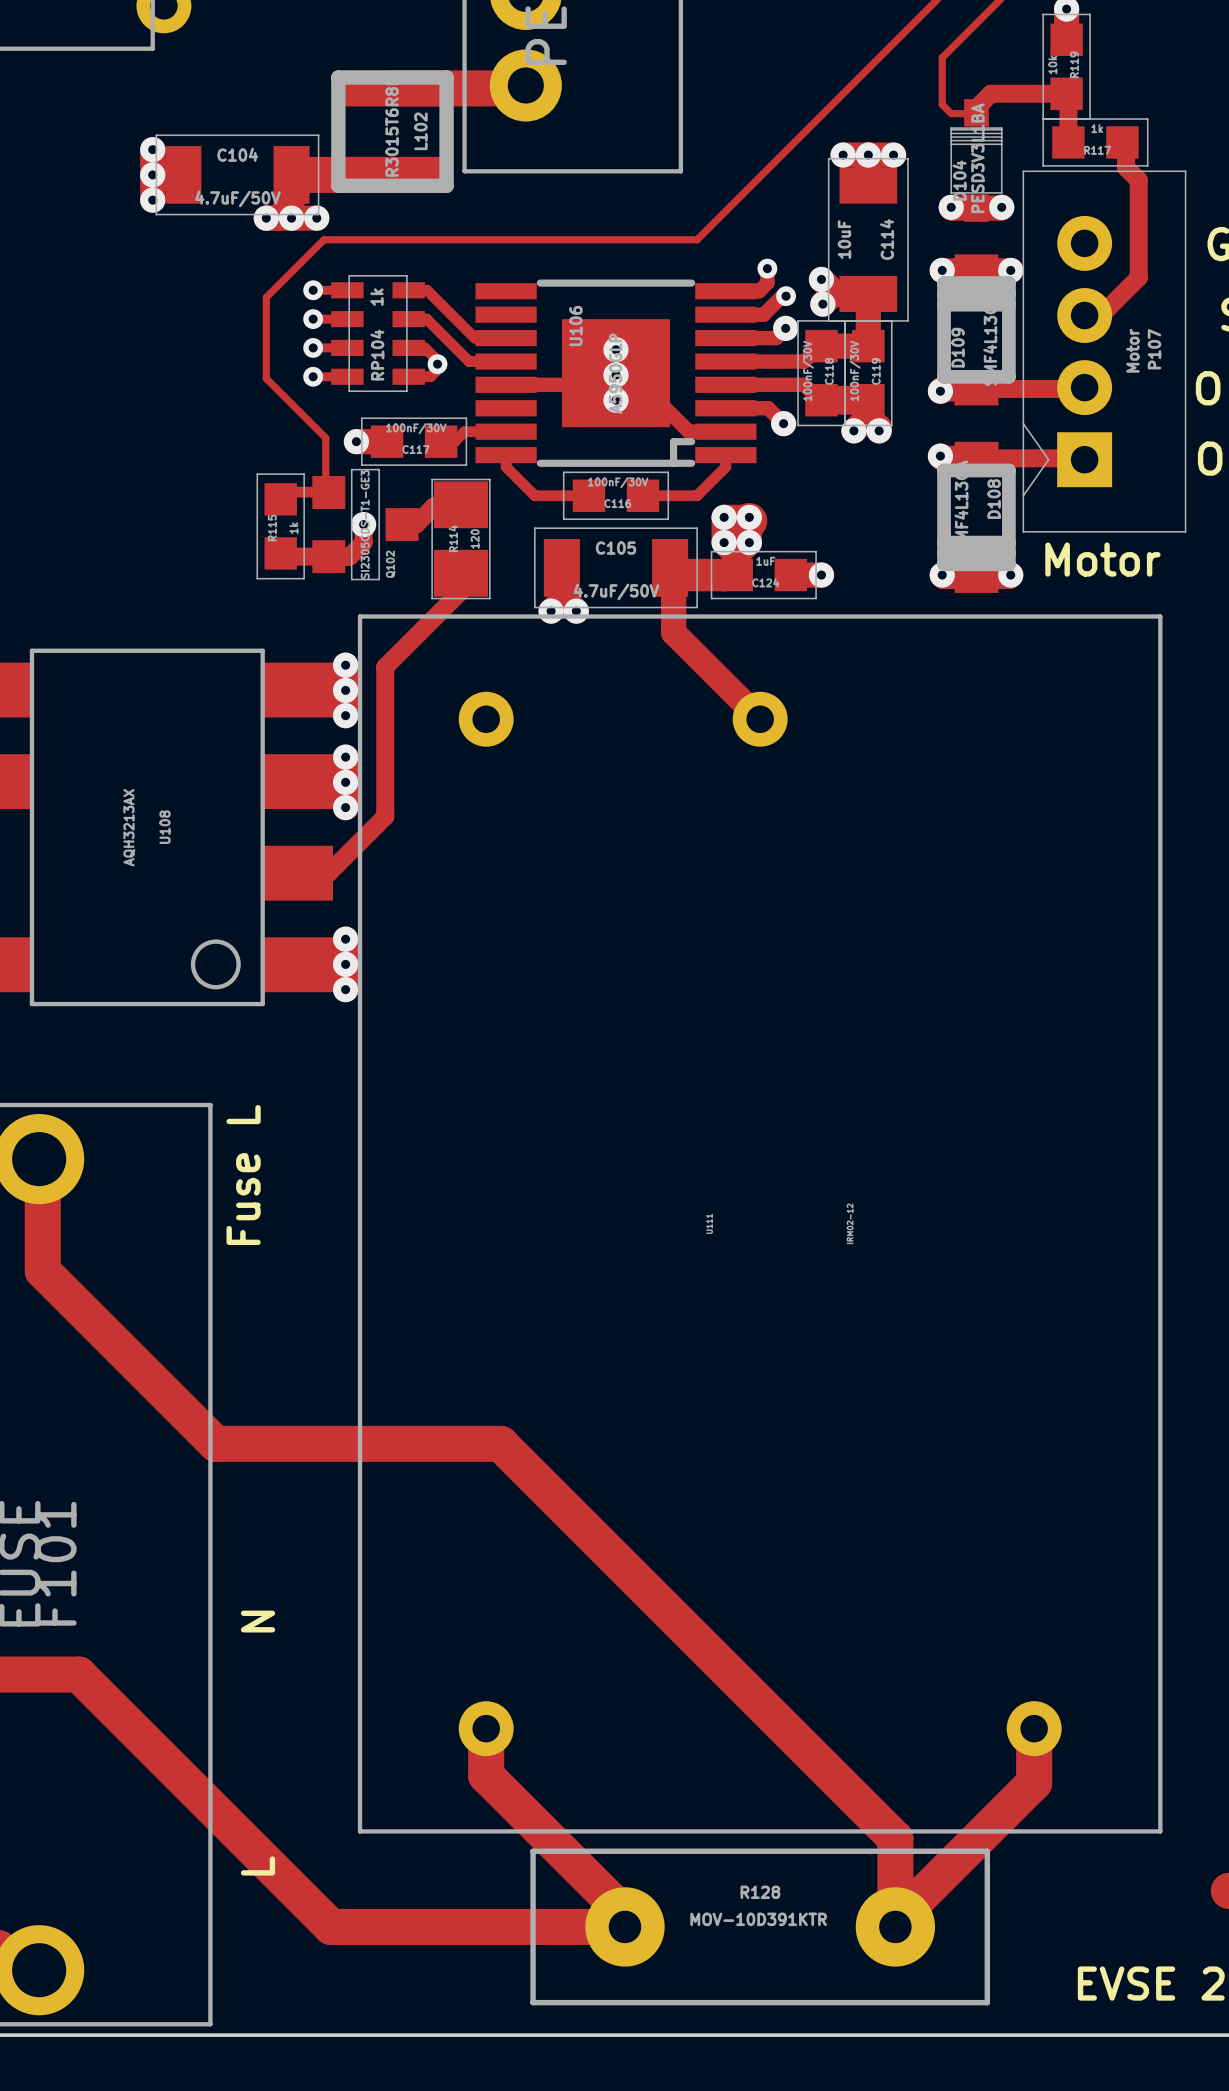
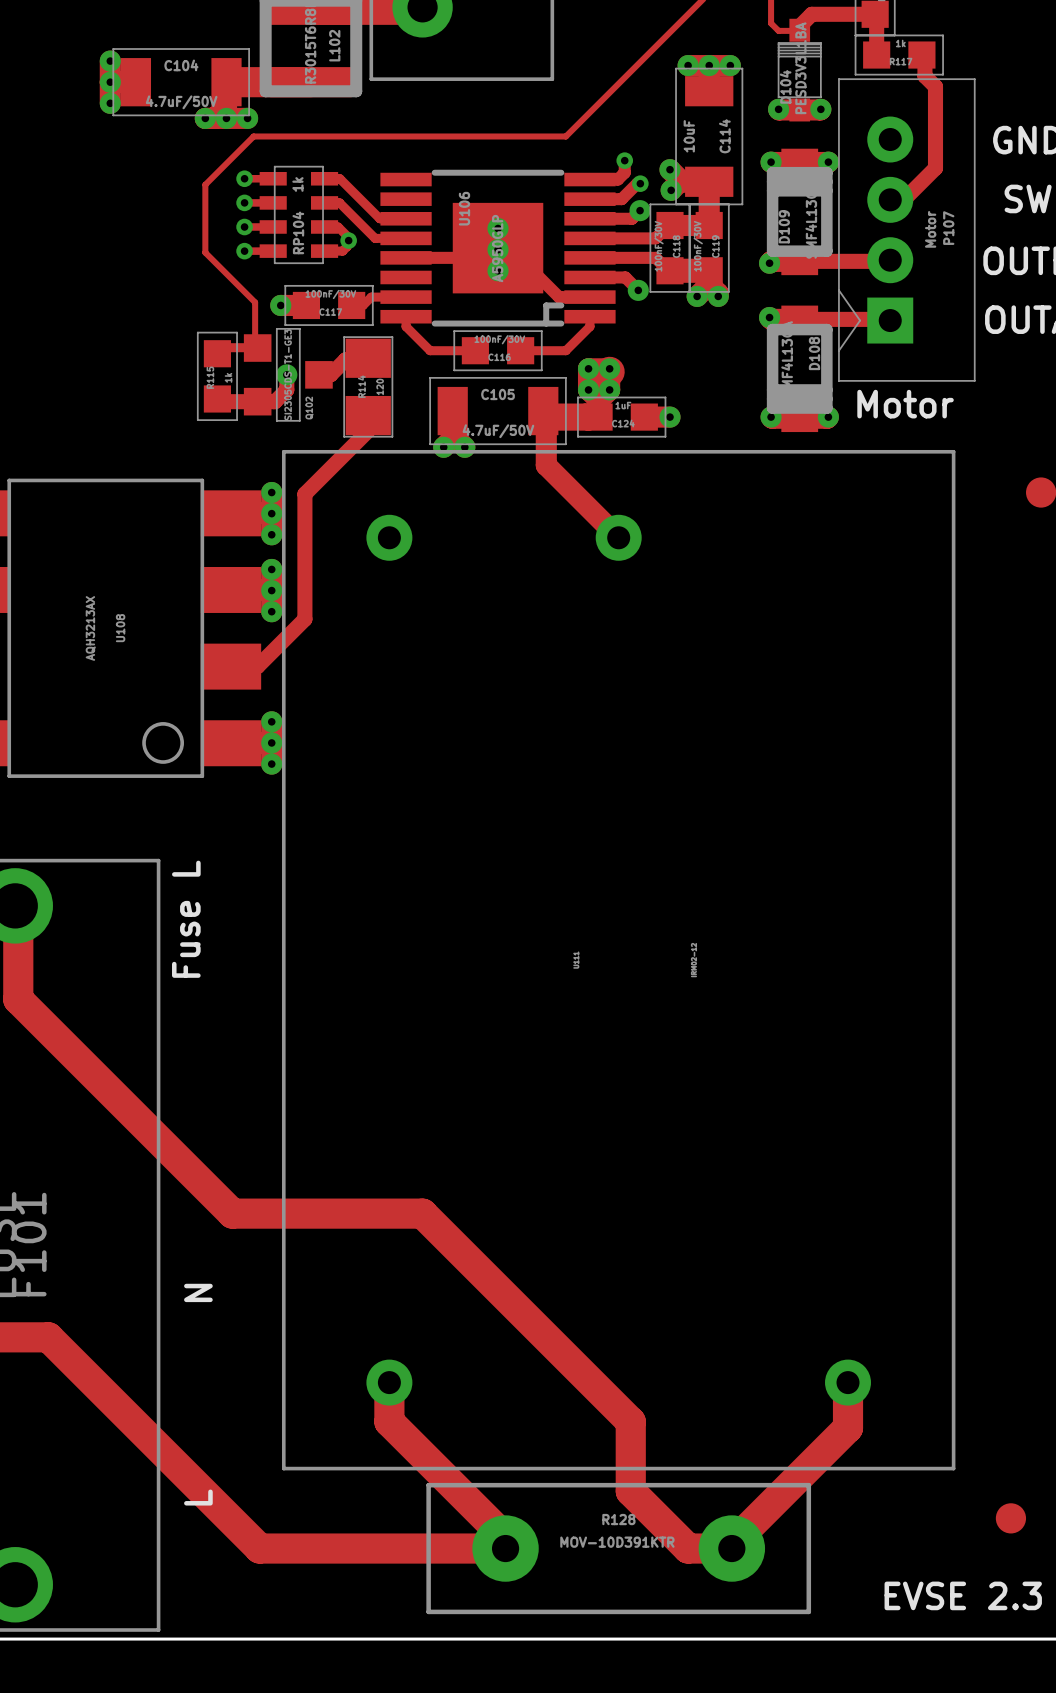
track: (215, 1443) (500, 1443) (895, 1838) (895, 1926) -> (163, 1144) (232, 1213) (422, 1213) (630, 1421) (630, 1491) (688, 1548) (731, 1548)

